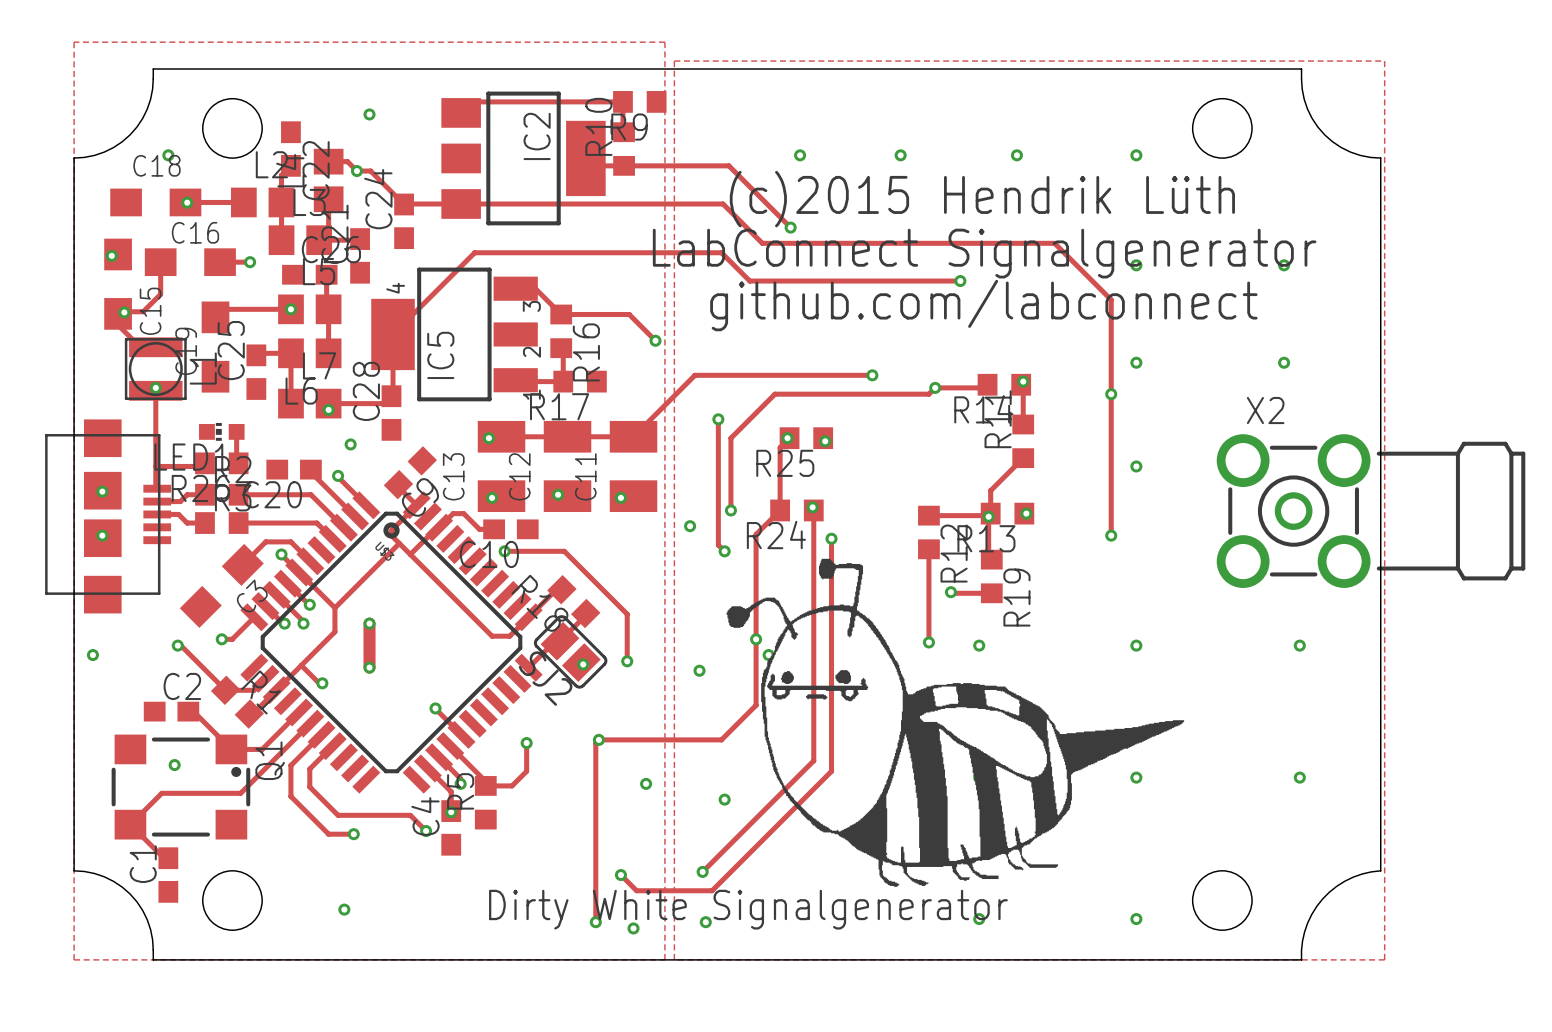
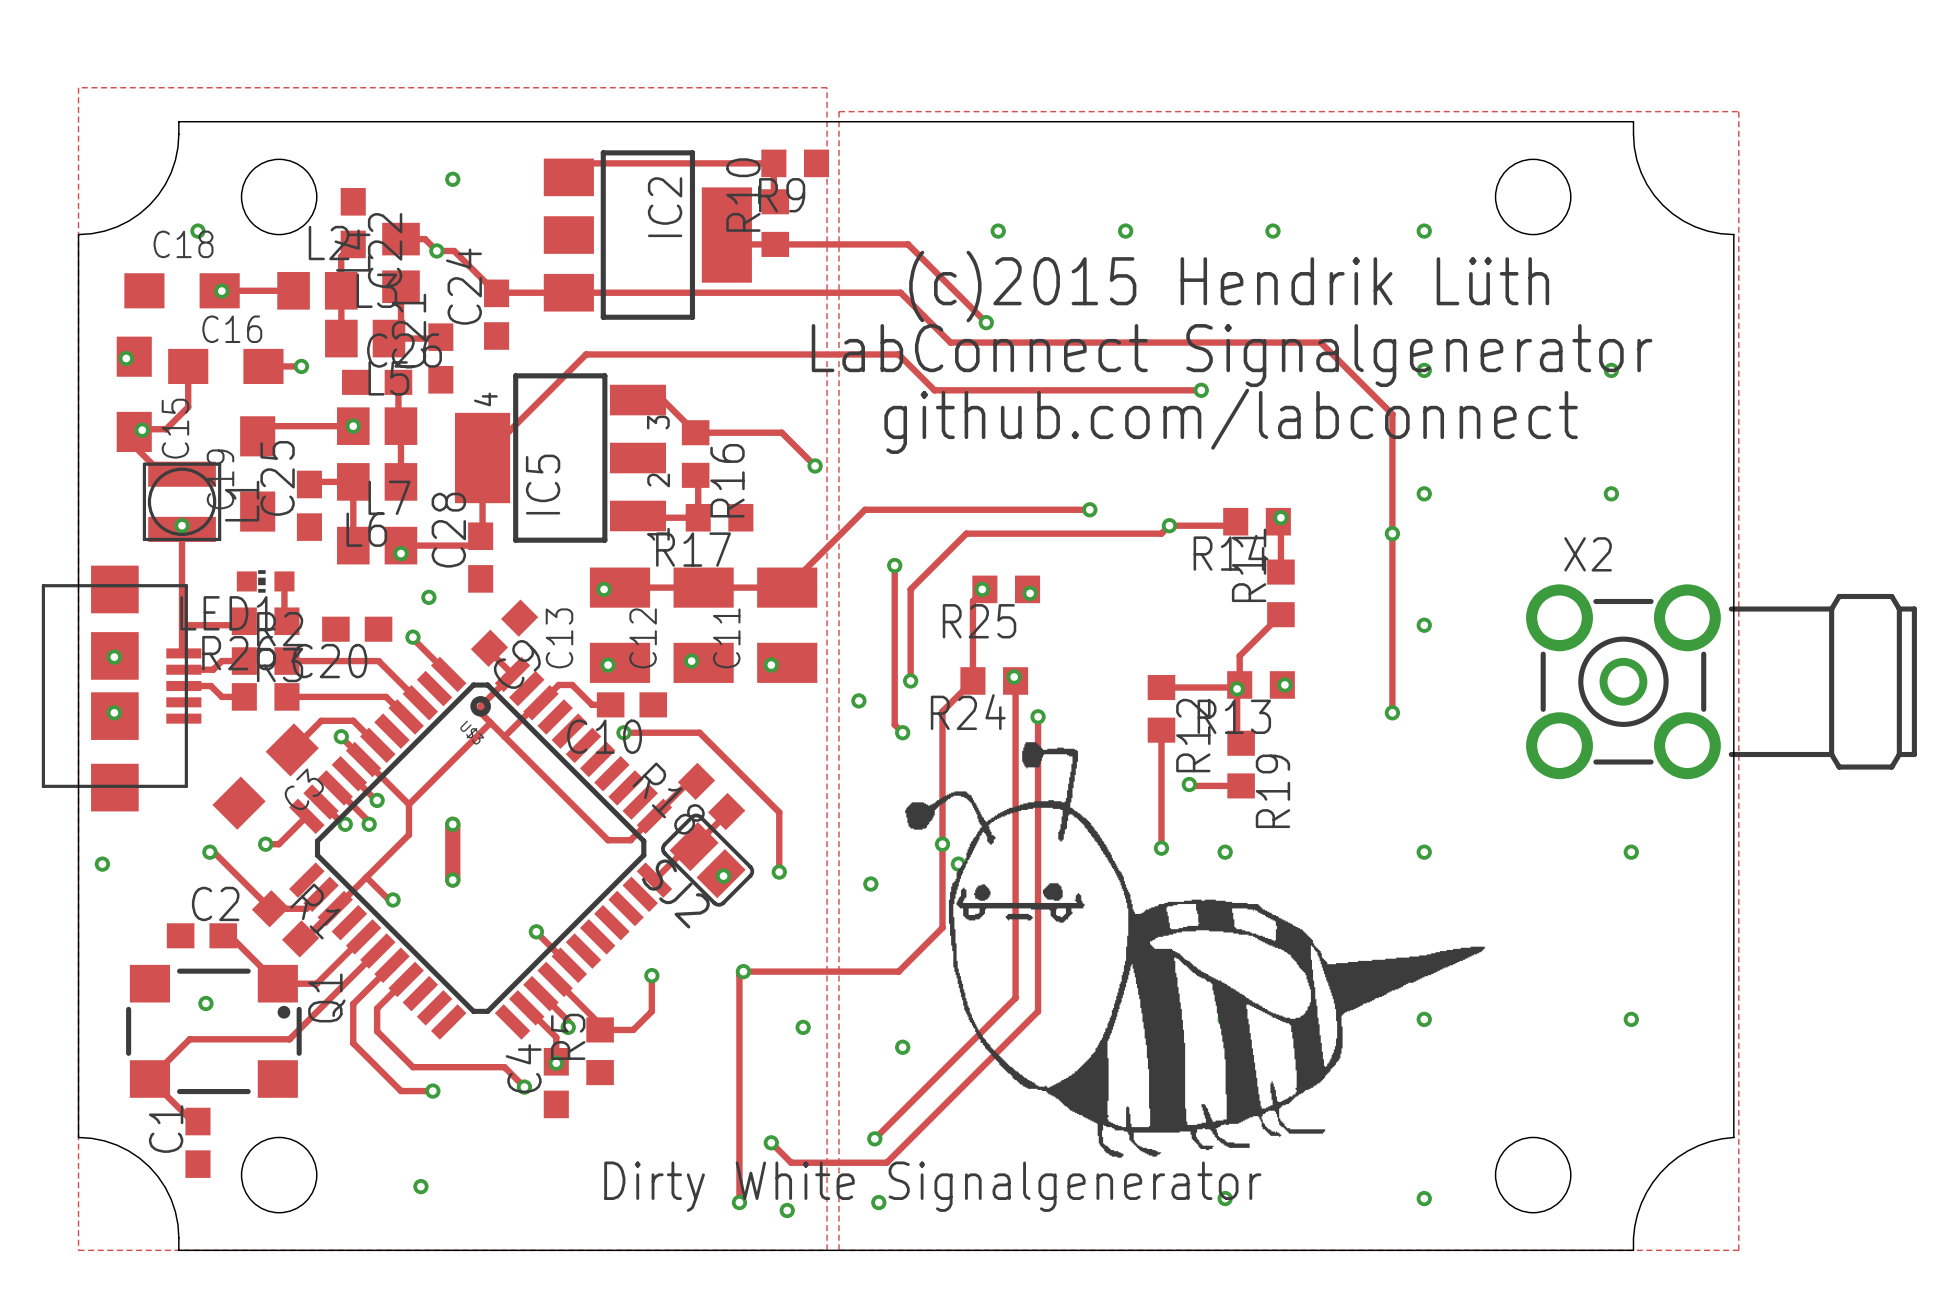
track: (310, 469) (310, 472) (355, 516) -> none

